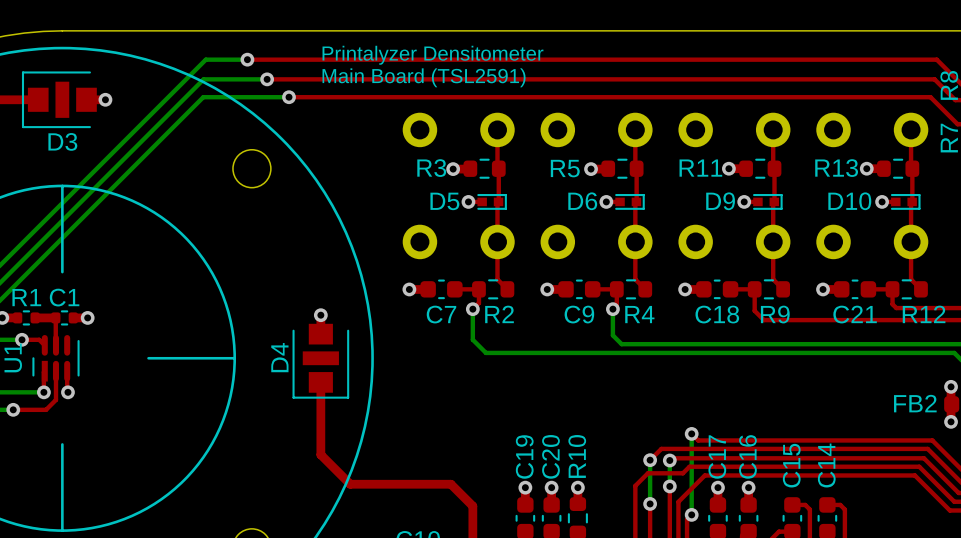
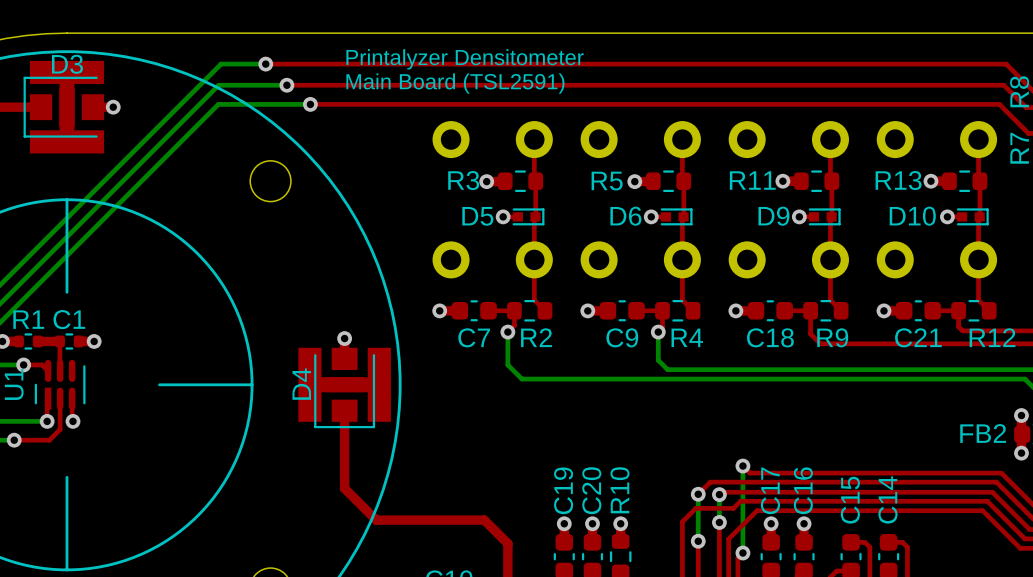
D3 footprint: [21, 71, 97, 129] -> [23, 60, 105, 154]
D3 name position: D3 (62, 141) -> D3 (67, 64)
D4 footprint: [292, 323, 350, 399] -> [298, 347, 391, 429]

